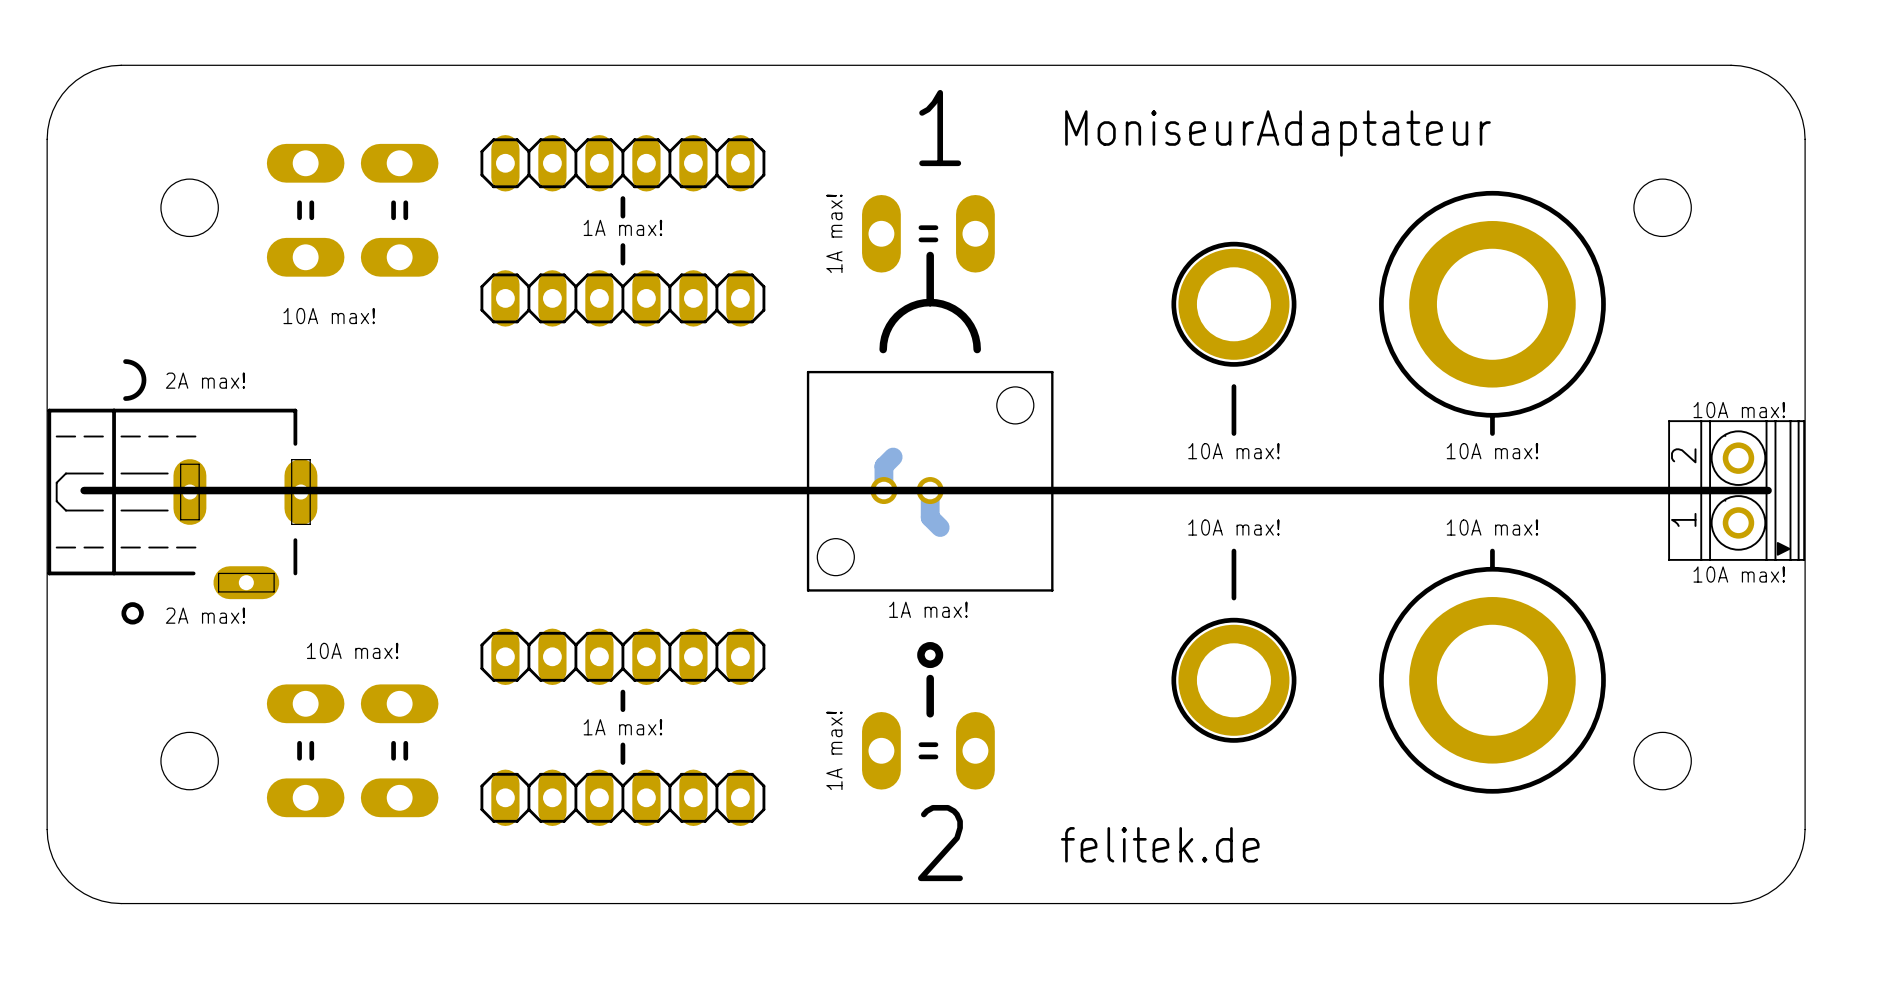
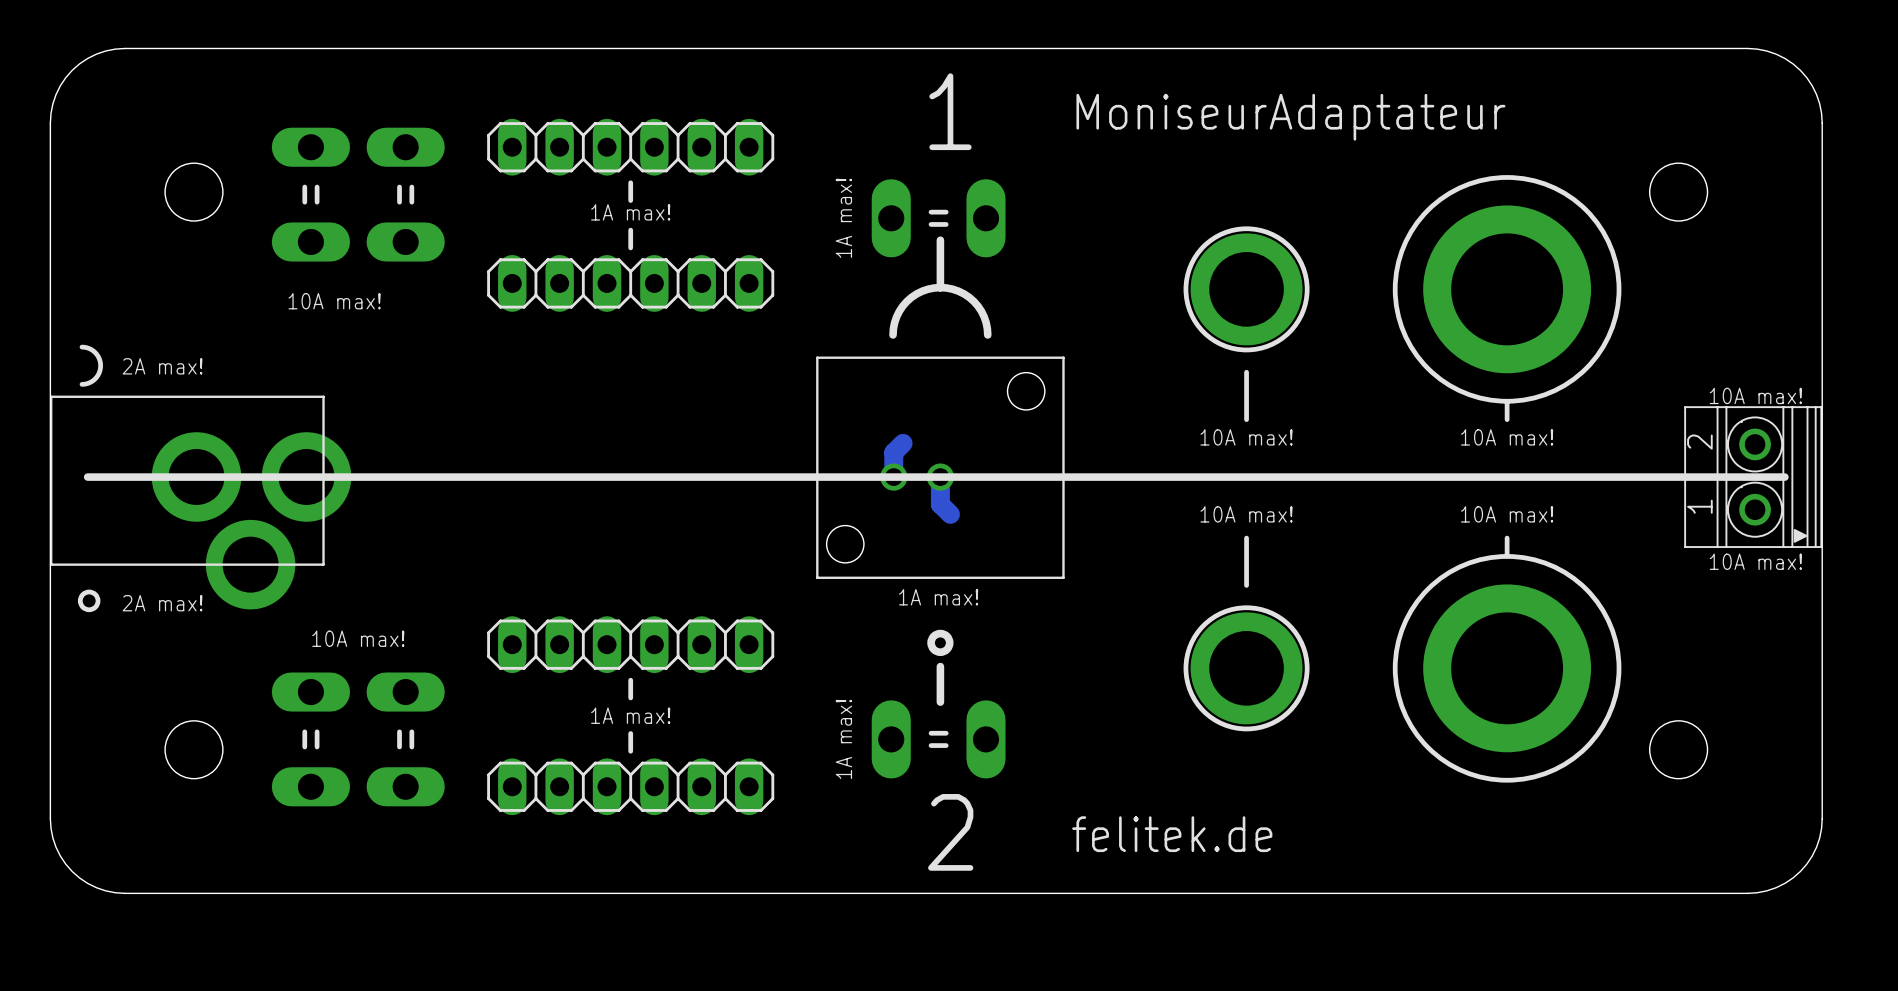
line: (125, 361) (138, 366) (144, 380) (138, 393) (125, 398) -> (81, 347) (95, 352) (100, 365) (95, 378) (81, 384)
text position: 2A max! (205, 380) -> 2A max! (162, 366)
part footprint: [47, 408, 318, 600] -> [50, 395, 352, 610]
drawing position: (132, 613) -> (89, 600)
text position: 2A max! (205, 615) -> 2A max! (162, 603)

